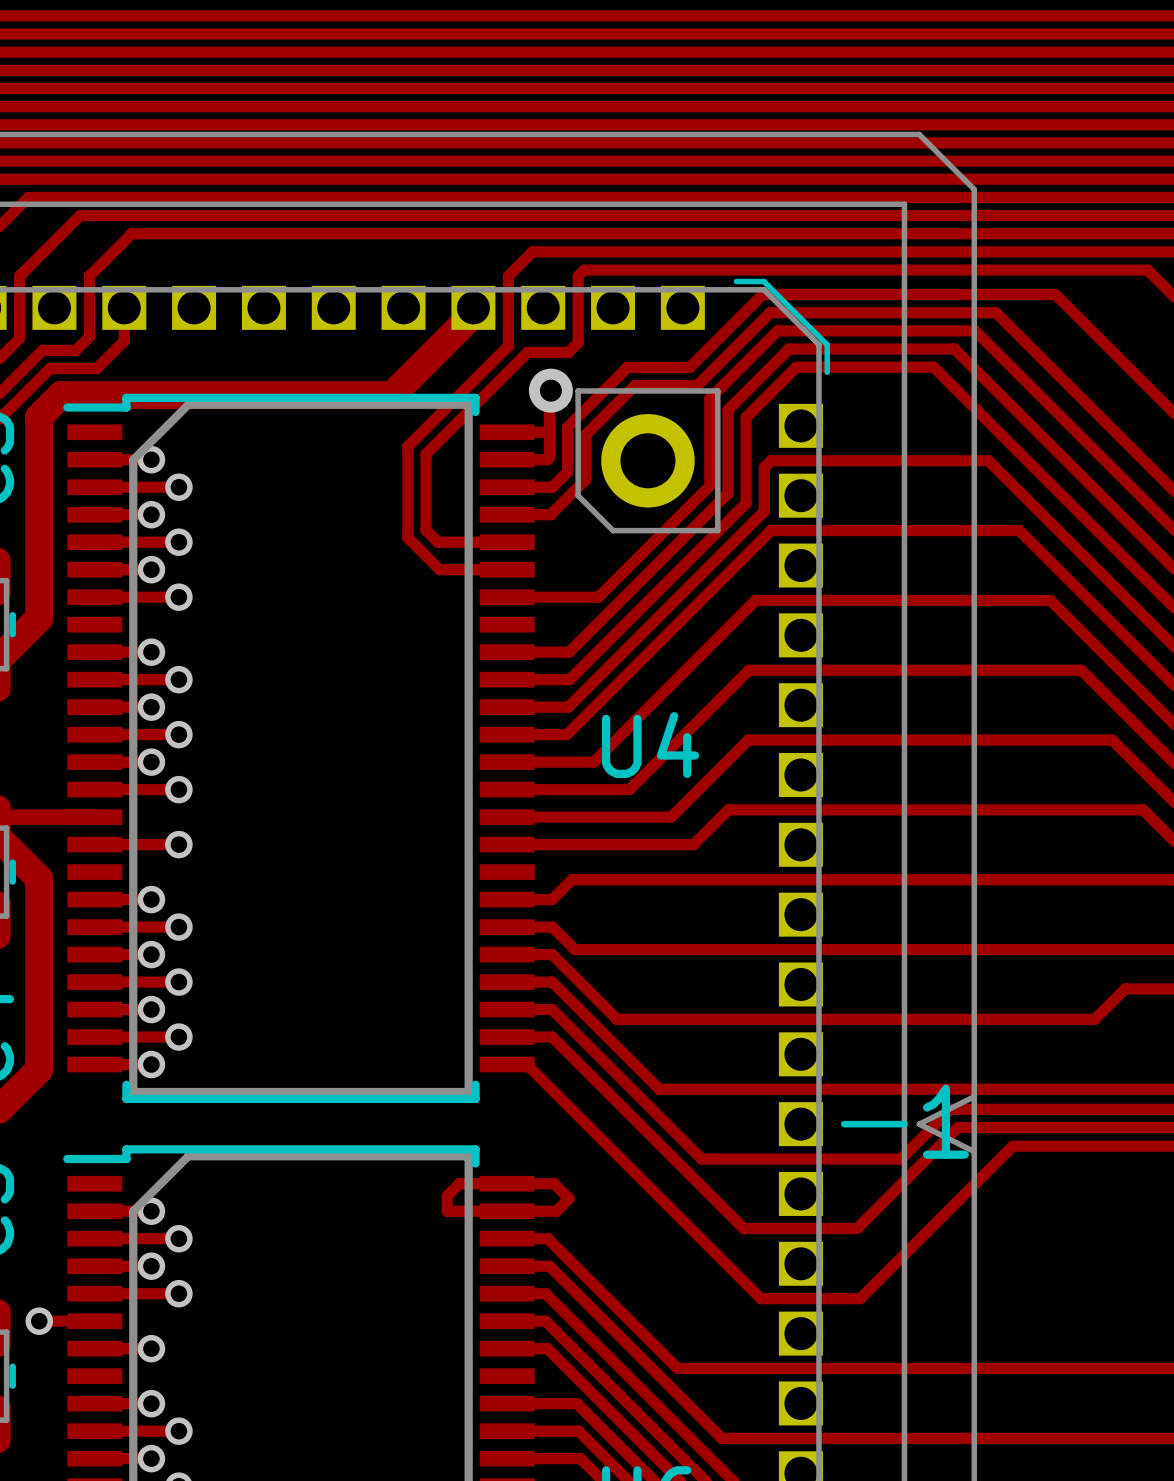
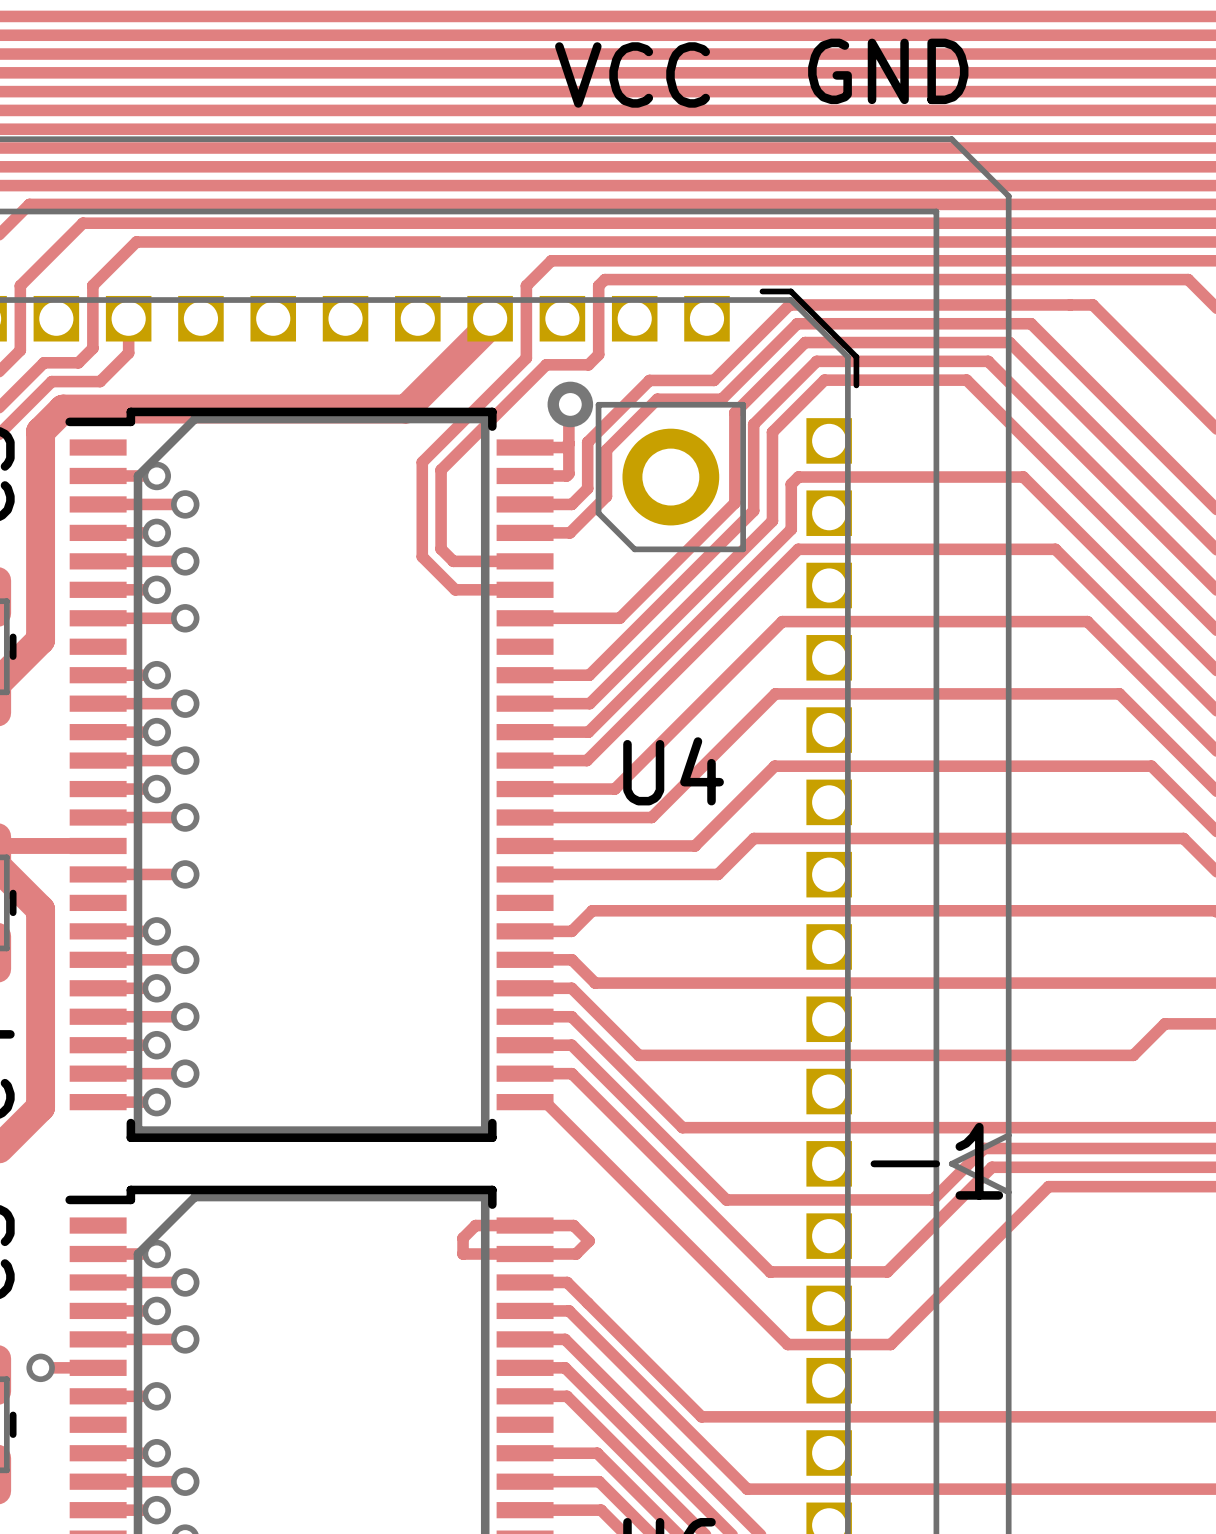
text: none -> GND (888, 71)
text: none -> VCC (632, 74)

